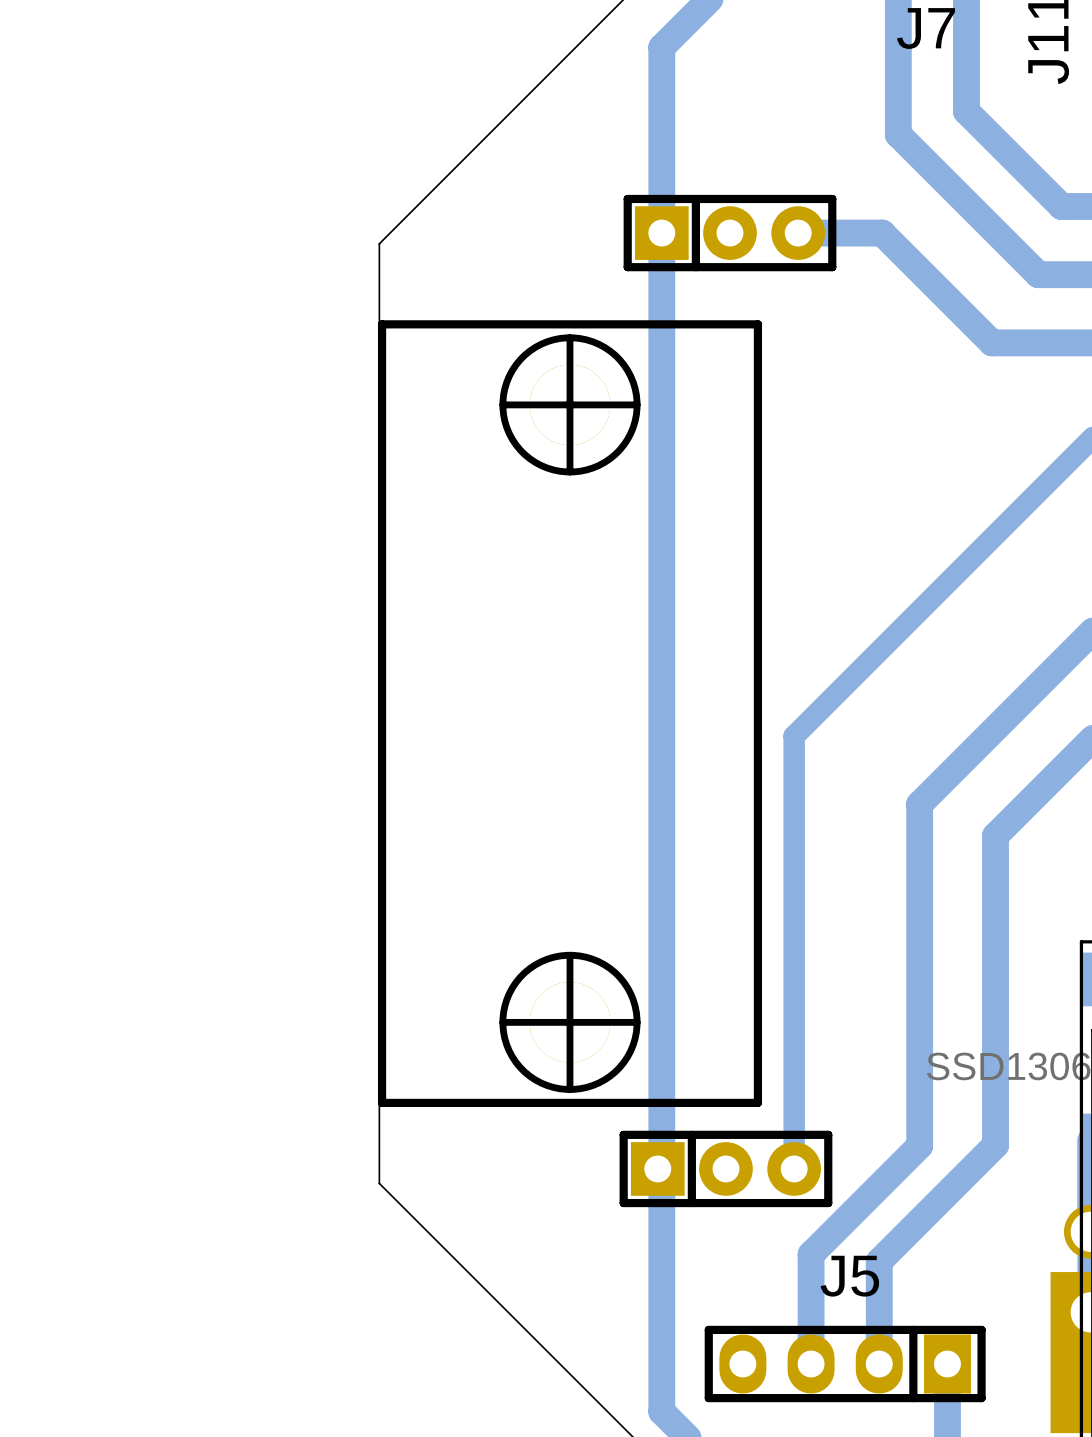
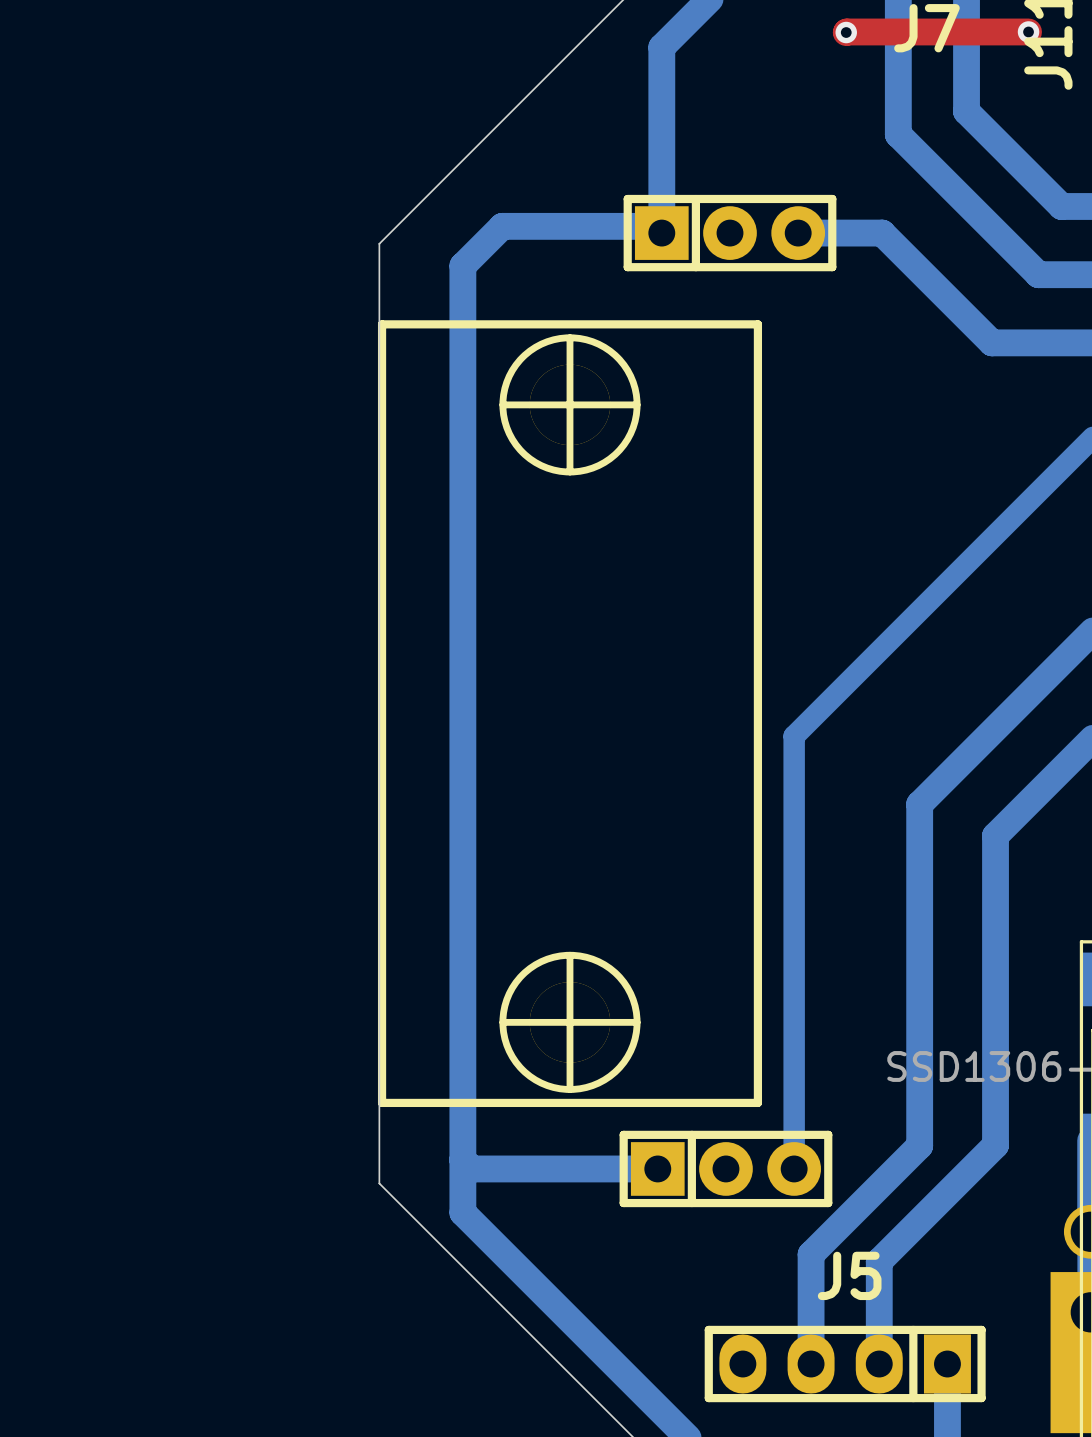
top track: none -> (1028, 31) (846, 32)
via: none -> (1028, 31)
via: none -> (846, 32)
bottom track: (661, 233) (661, 1411) -> (661, 233) (655, 226) (502, 226) (462, 265) (462, 1212) (661, 1411)
bottom track: none -> (462, 1159) (472, 1168) (657, 1168)

